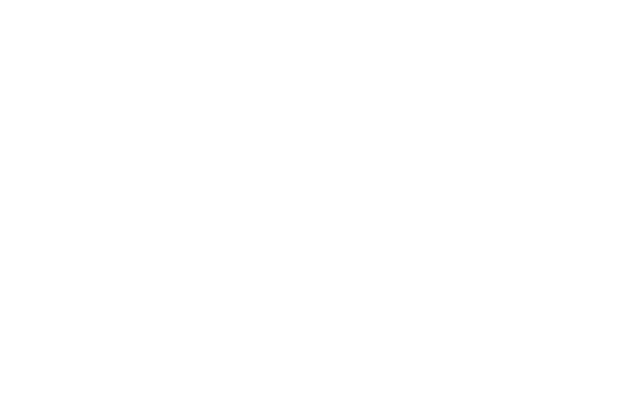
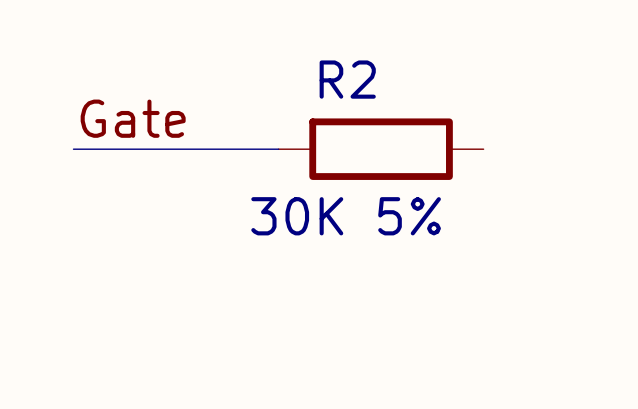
label: none -> Gate (133, 118)
wire: none -> (73, 149) (278, 149)
R2: none -> 30K 5% (381, 149)

